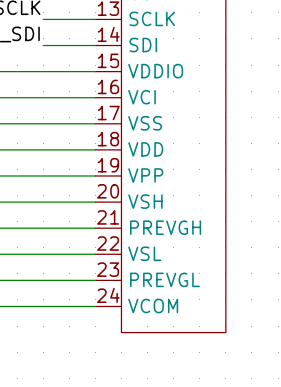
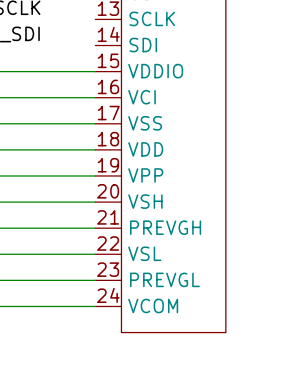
wire: (43, 19) (95, 19) -> none
wire: (43, 45) (95, 45) -> none

